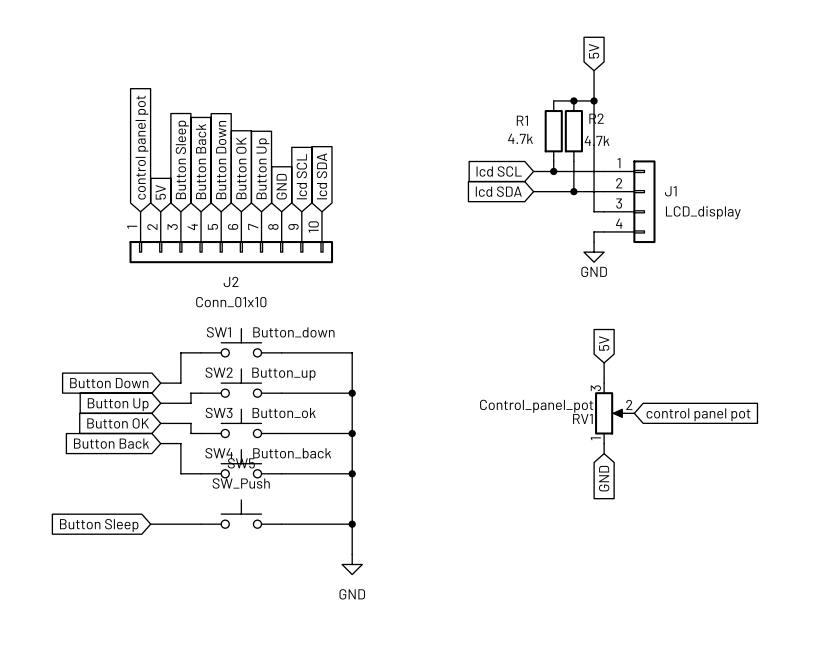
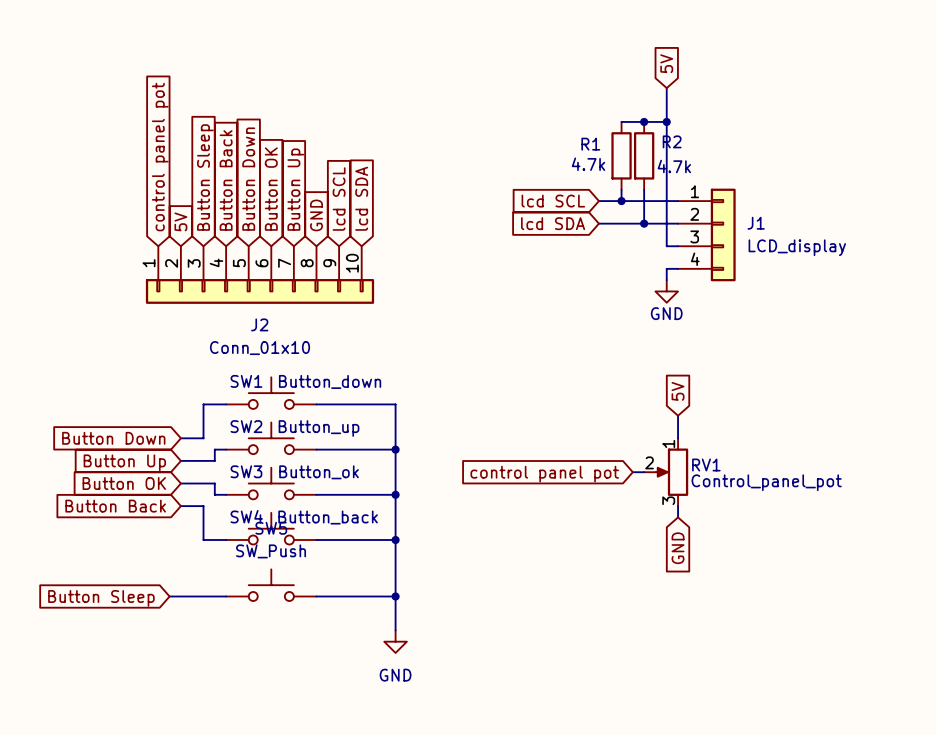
wire: none -> (632, 472) (644, 472)
RV1 rotation: 0° (609, 413) -> 180° (671, 472)
global label rotation: 0° (698, 414) -> 180° (544, 474)
global label position: control panel pot (698, 414) -> control panel pot (544, 474)

